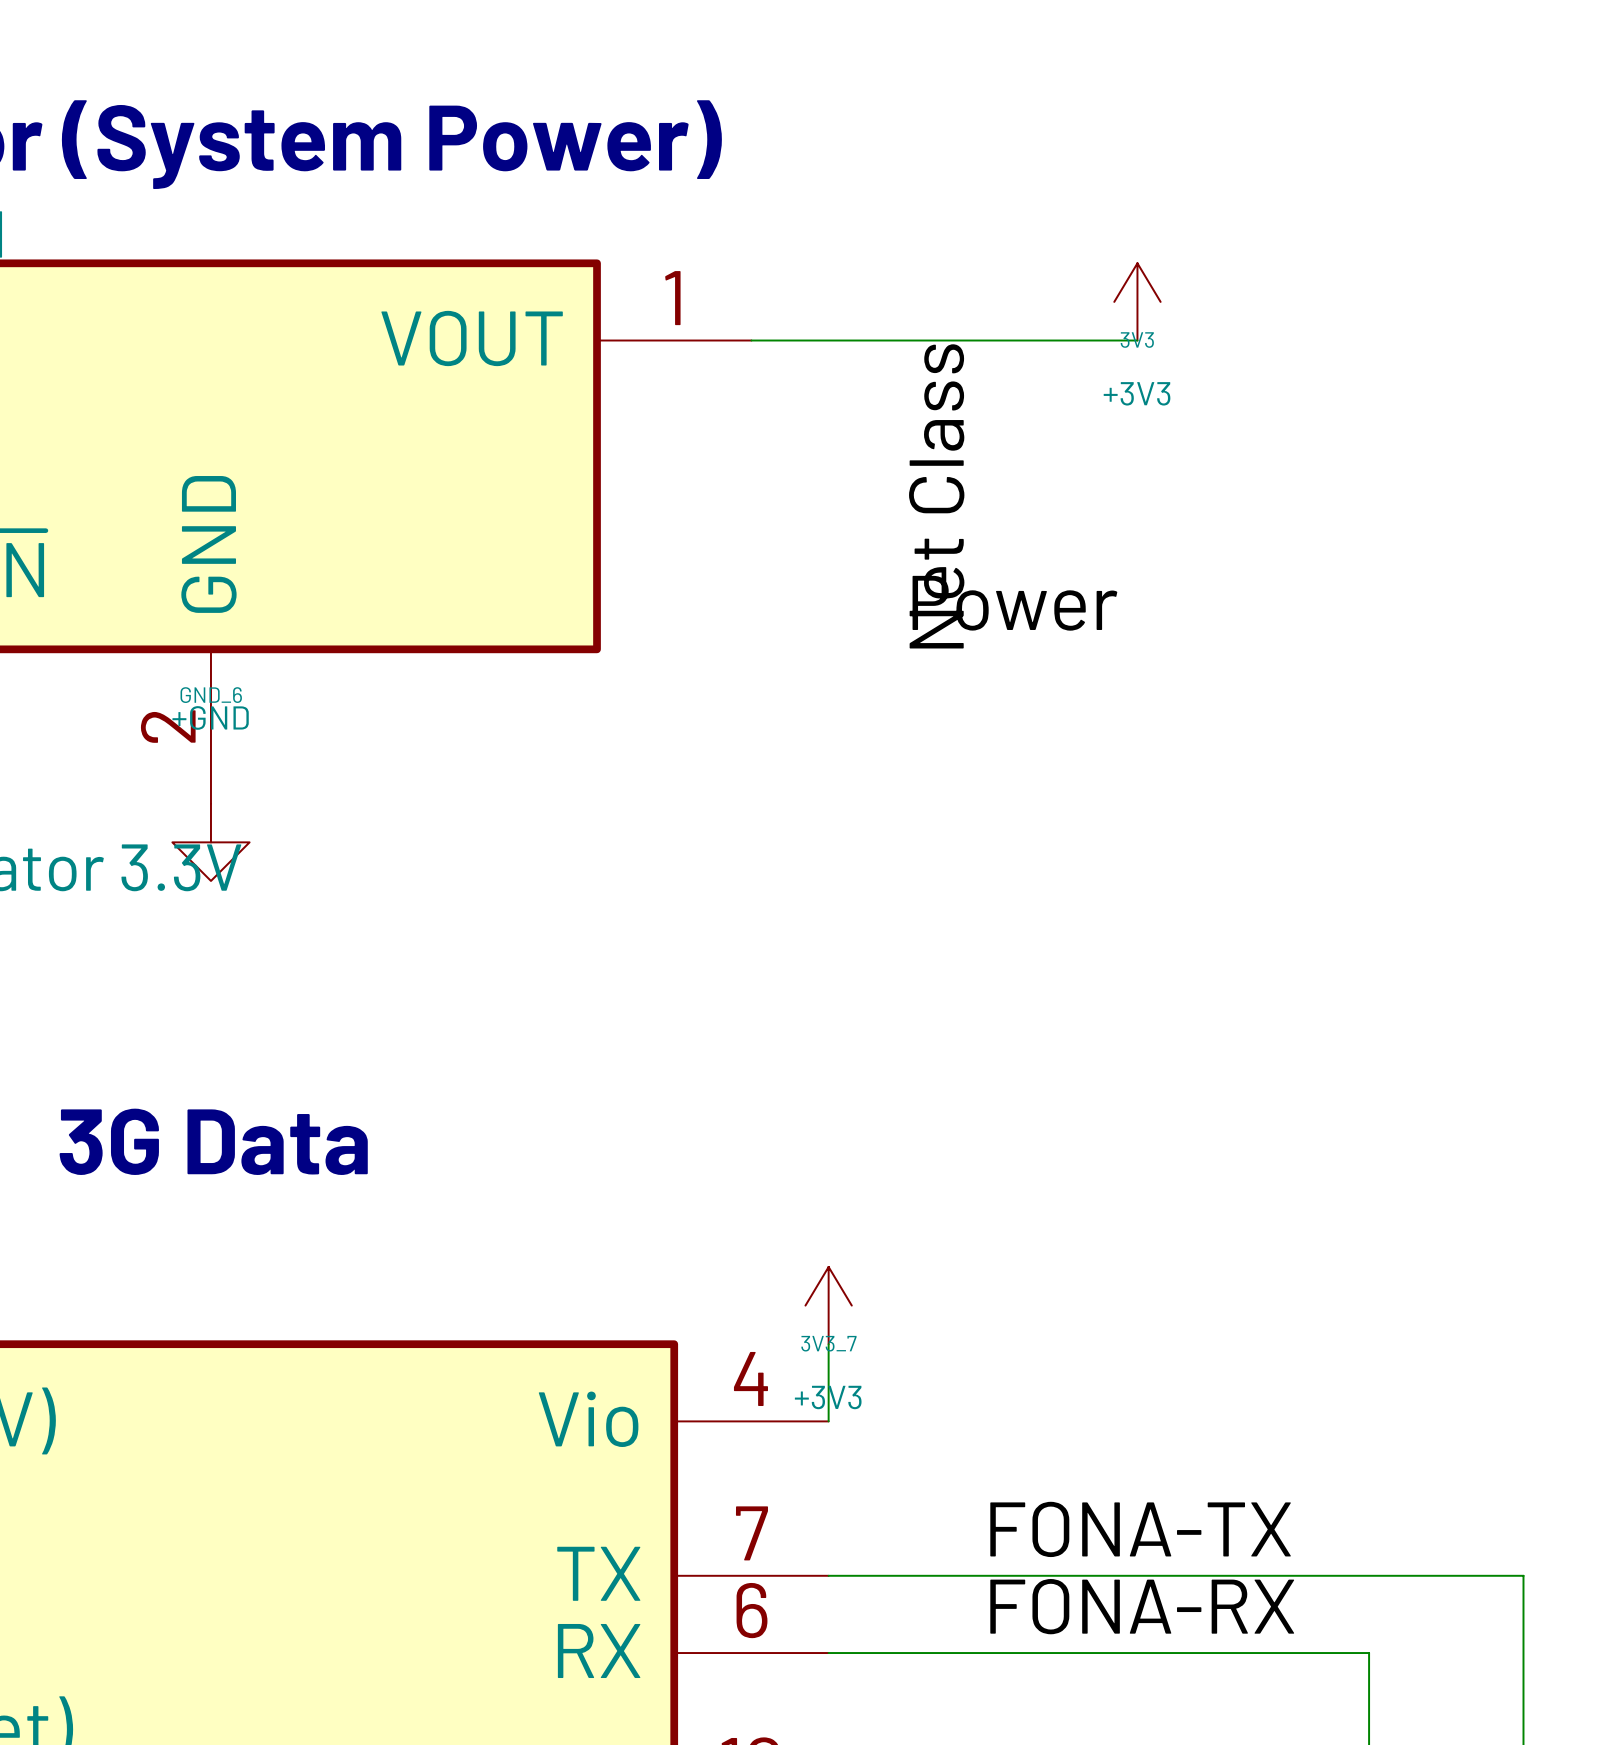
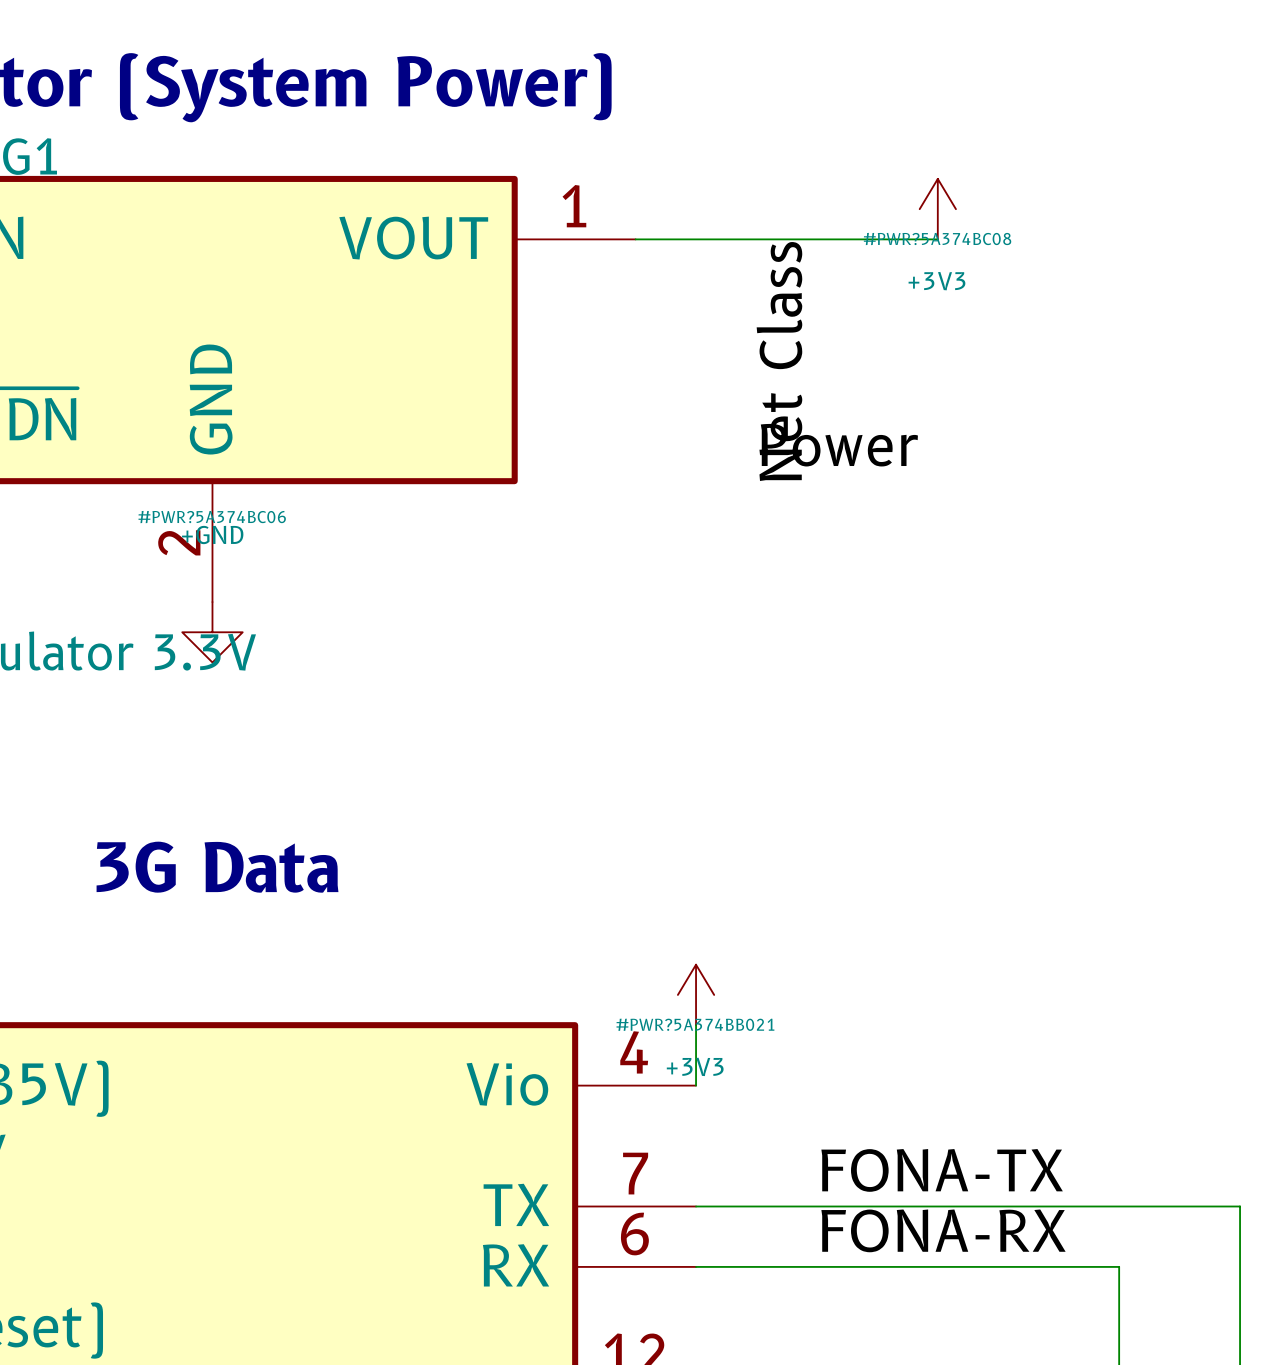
3V3 name: 3V3 (1137, 340) -> #PWR?5A374BC08 (937, 239)
GND_6 name: GND_6 (211, 695) -> #PWR?5A374BC06 (212, 517)
3V3_7 name: 3V3_7 (828, 1343) -> #PWR?5A374BB021 (695, 1024)

